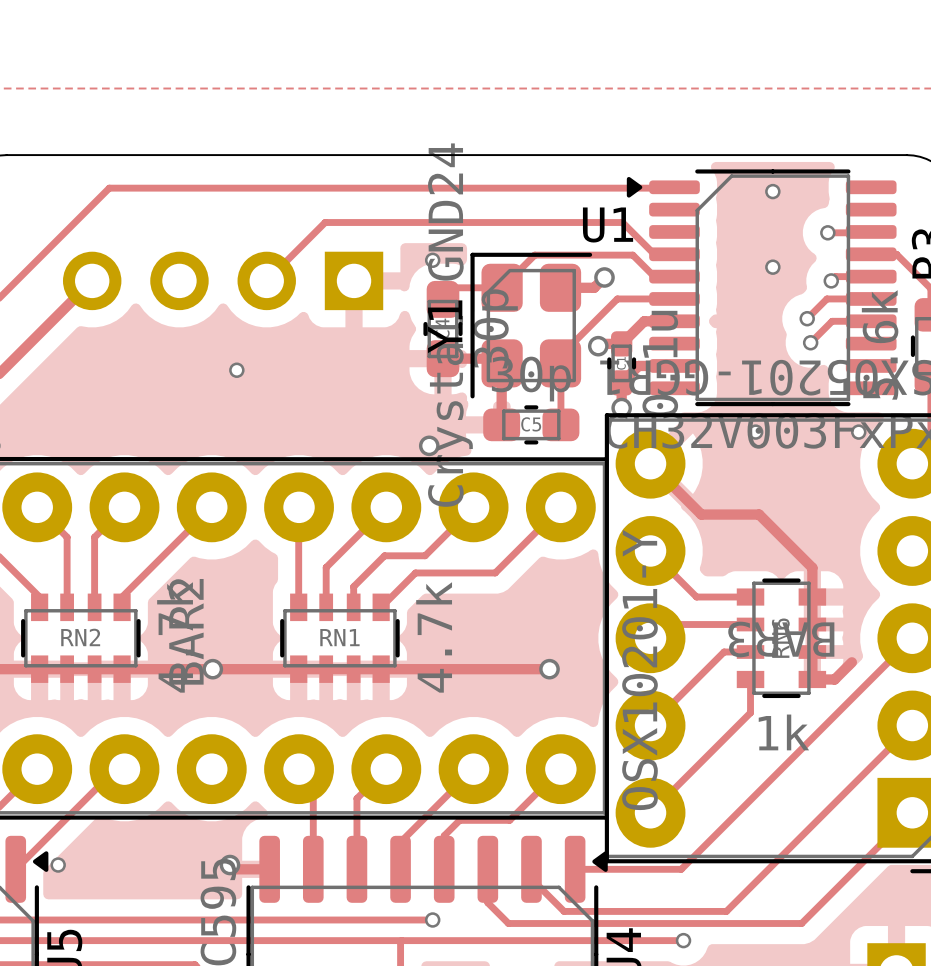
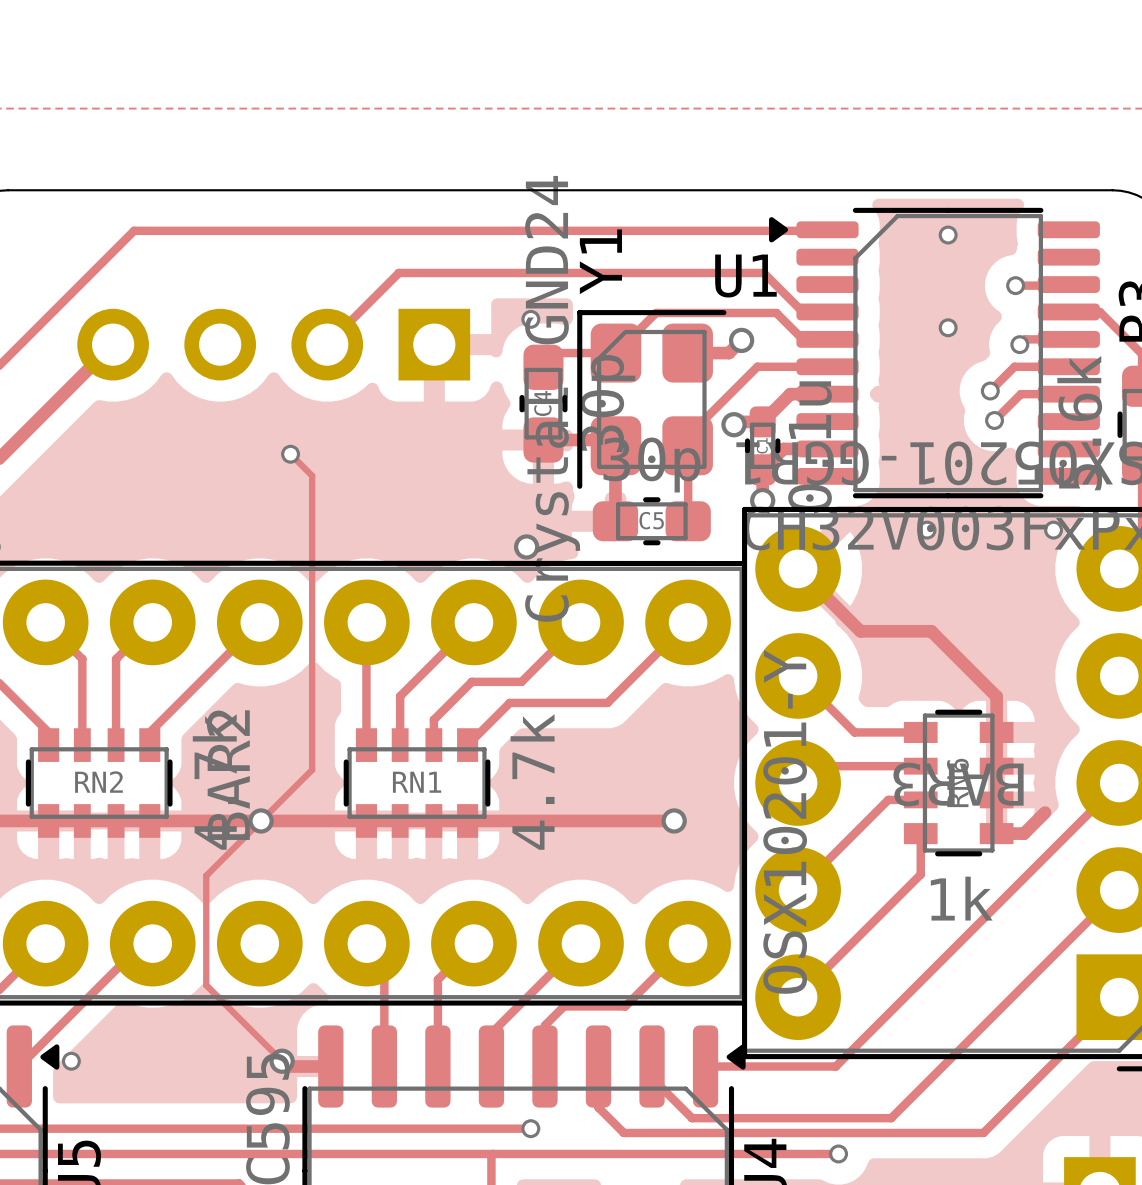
Y1 name position: Y1 (445, 326) -> Y1 (600, 261)
track: none -> (290, 454) (312, 475) (312, 769) (206, 875) (206, 985) (282, 1061)

